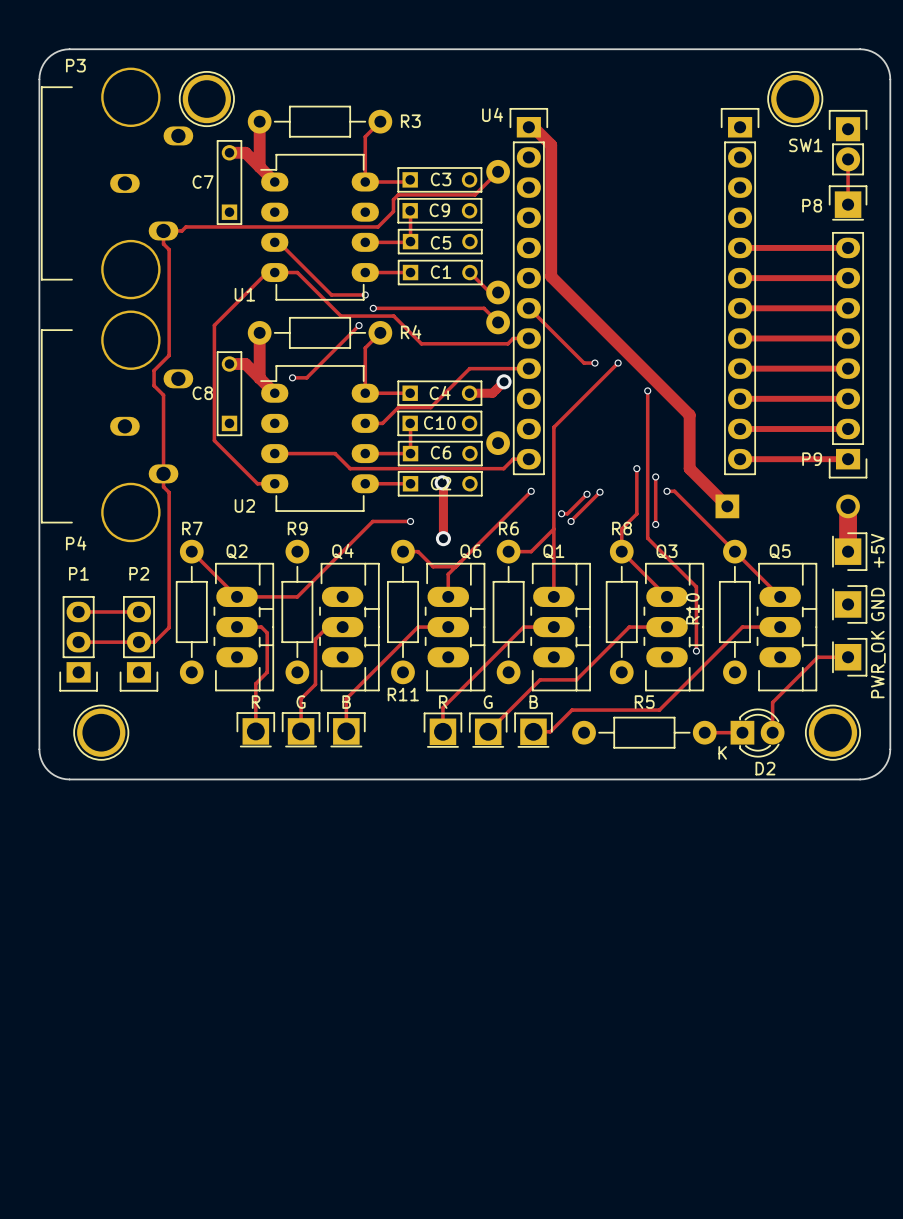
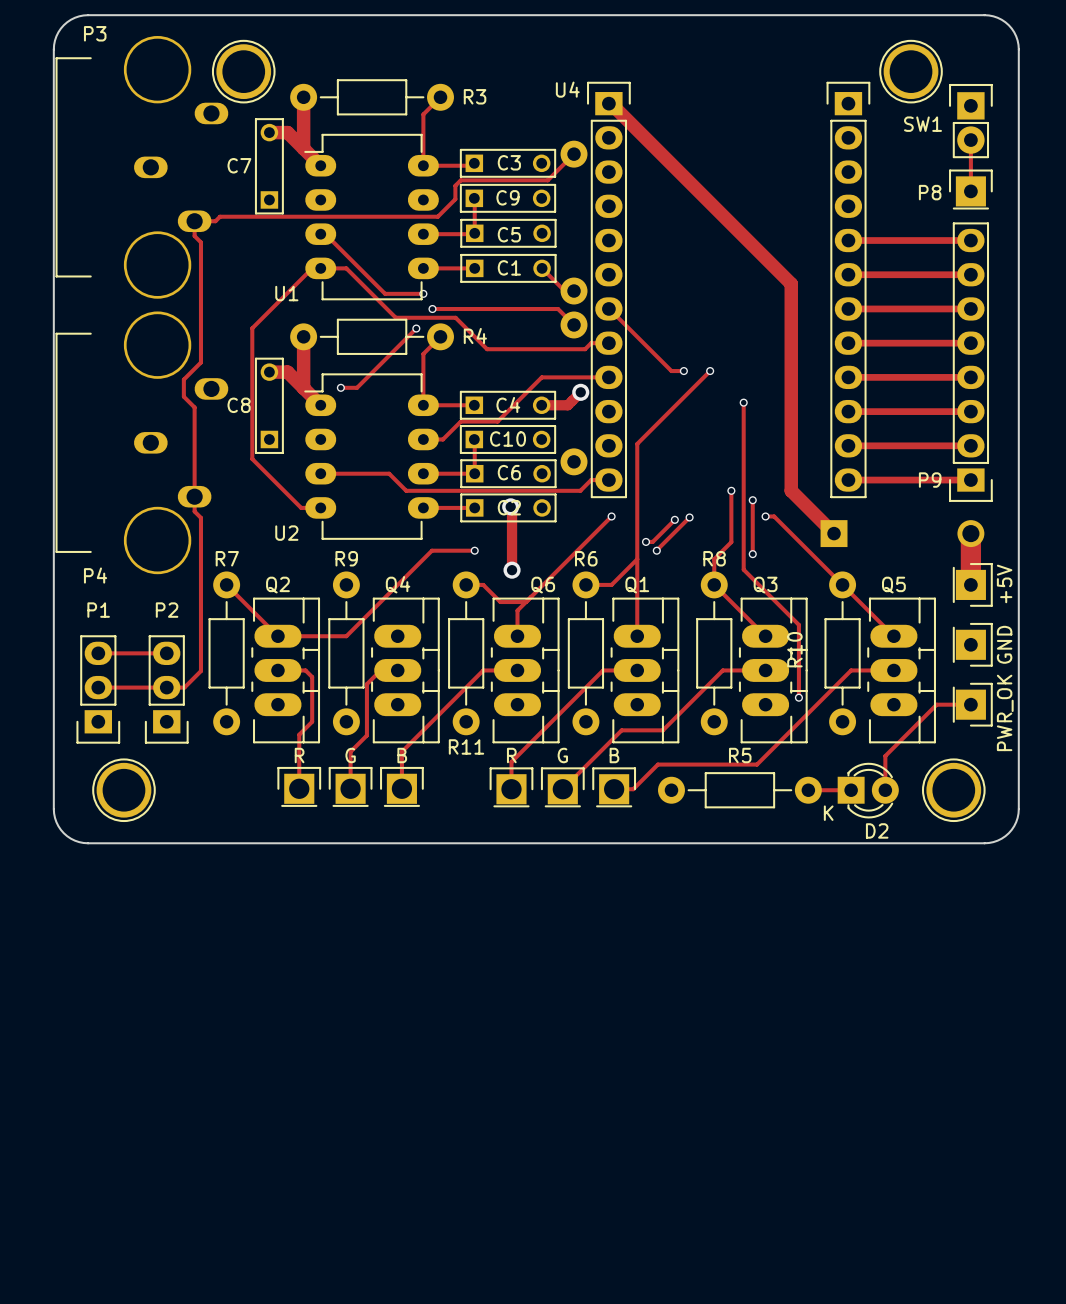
track: (530, 127) (533, 127) (551, 145) (551, 276) (689, 415) -> (610, 103) (791, 283) (791, 430)

